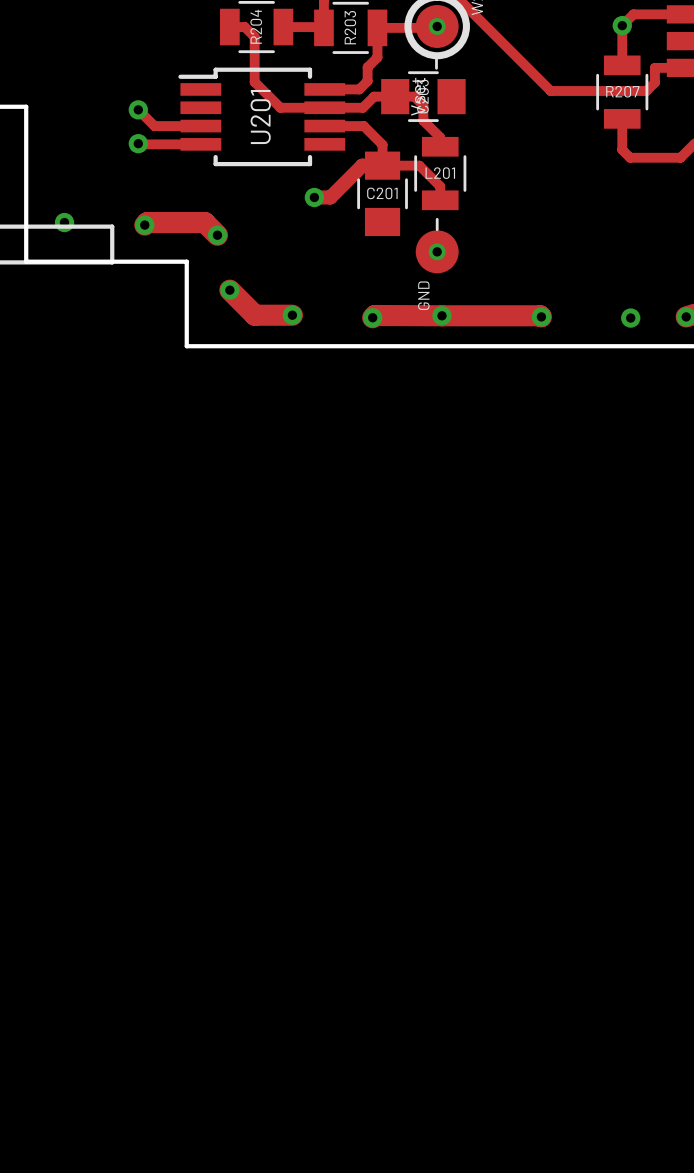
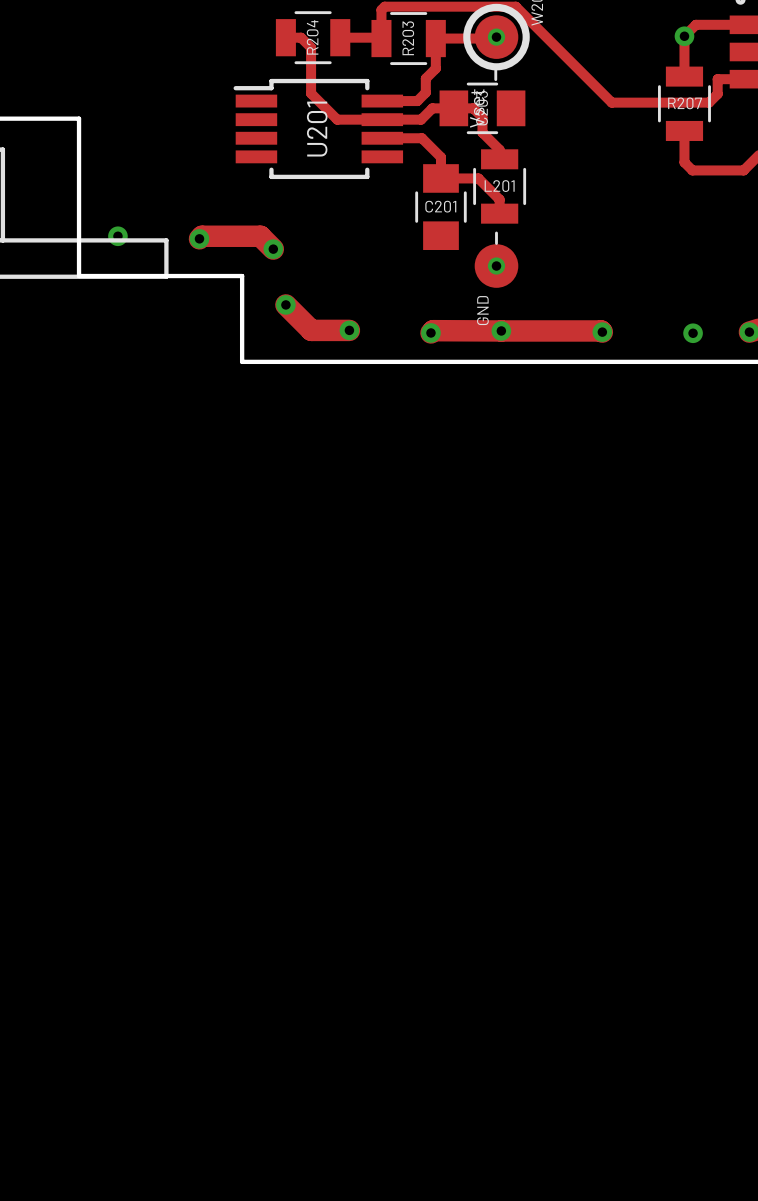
track: (138, 109) (154, 126) (200, 126) -> none
via: (138, 109) -> none
track: (138, 143) (200, 144) -> none
via: (138, 143) -> none
track: (382, 165) (362, 165) (330, 197) (314, 197) -> none
via: (314, 197) -> none

